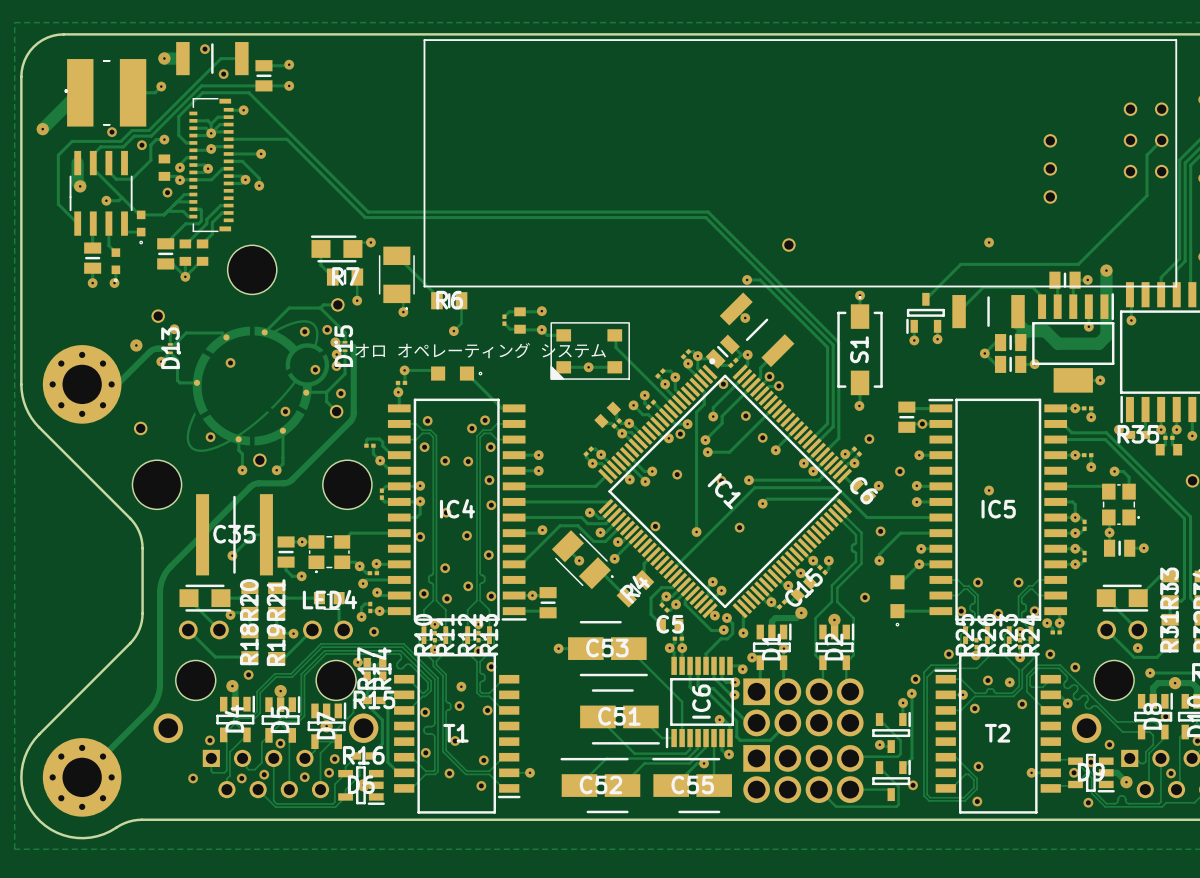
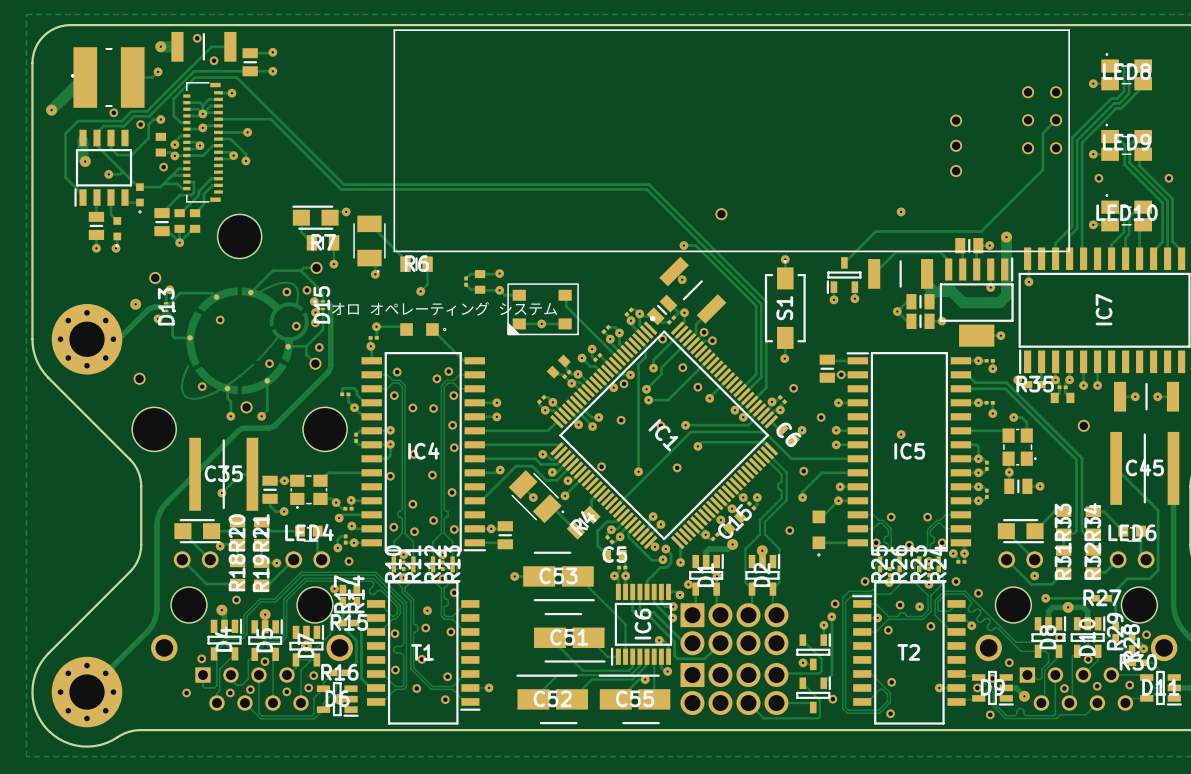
part footprint: [69, 150, 133, 236] -> [74, 129, 133, 207]

